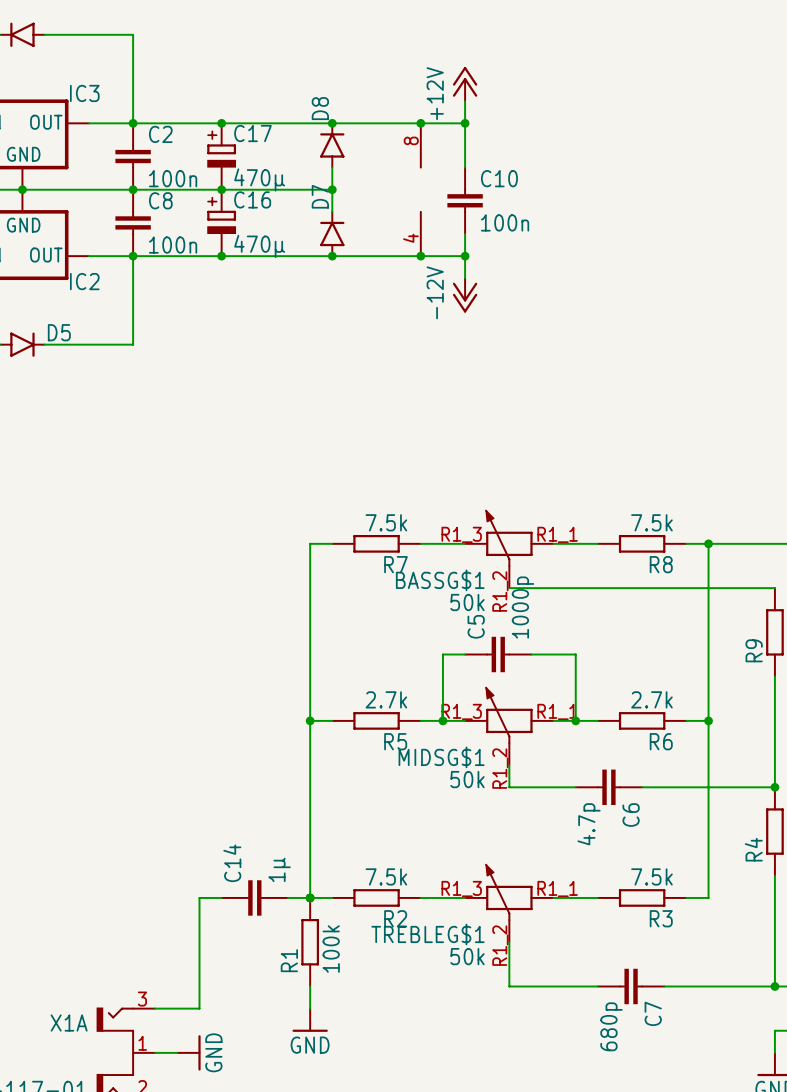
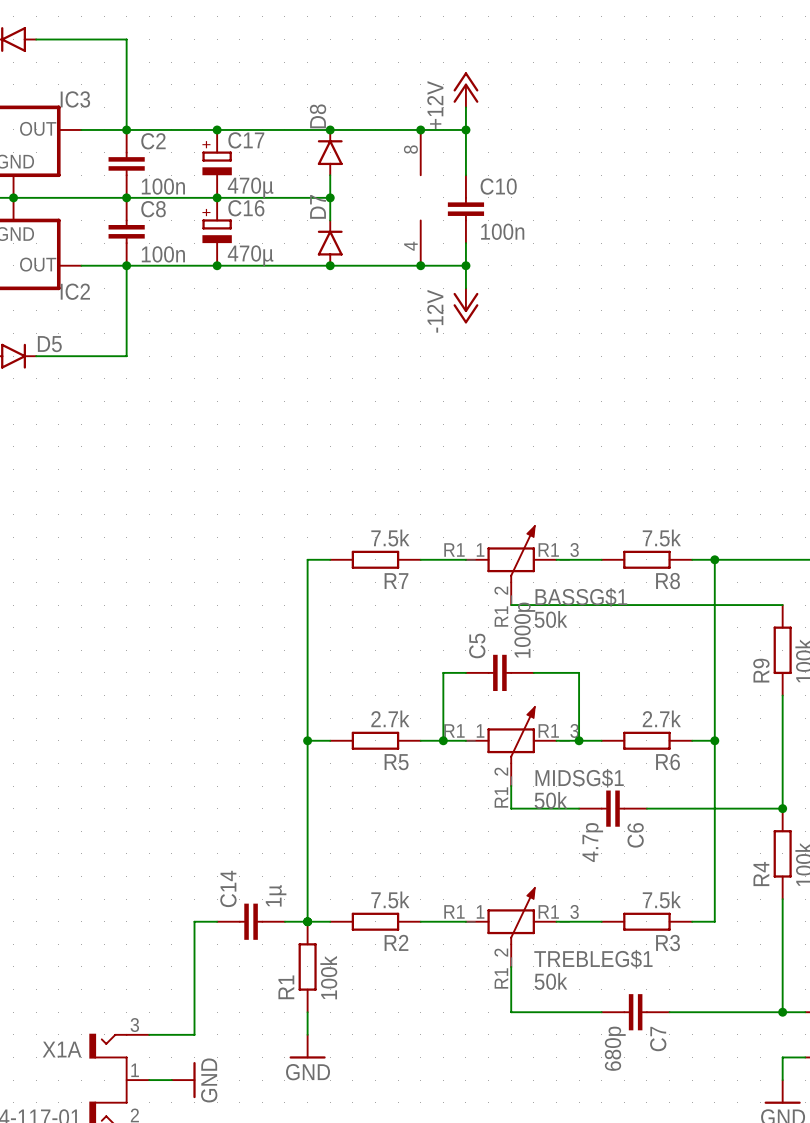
BASSG$1 flip: as is (509, 538) -> left-right (511, 554)
MIDSG$1 flip: as is (509, 715) -> left-right (511, 735)
TREBLEG$1 flip: as is (509, 892) -> left-right (511, 916)

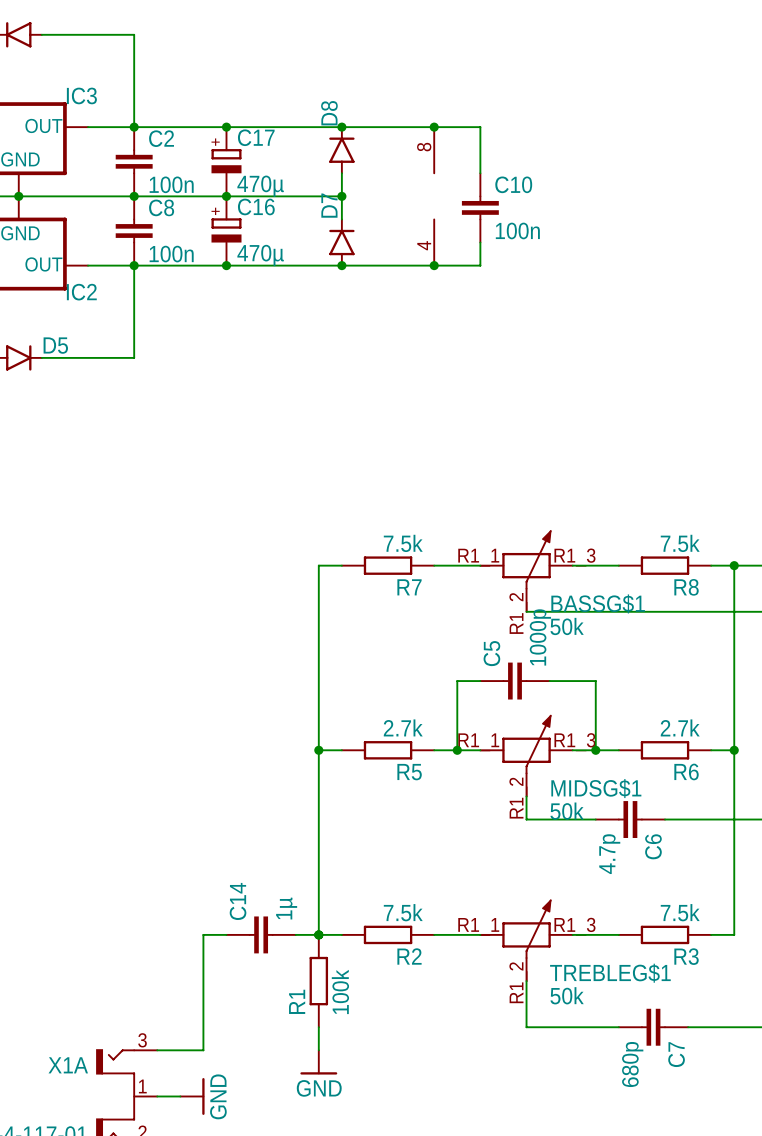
power symbol: +12V (465, 89) -> none
wire: (465, 107) (465, 129) -> none
junction: (465, 129) -> none
wire: (465, 265) (465, 288) -> none
junction: (465, 265) -> none
power symbol: -12V (465, 305) -> none

